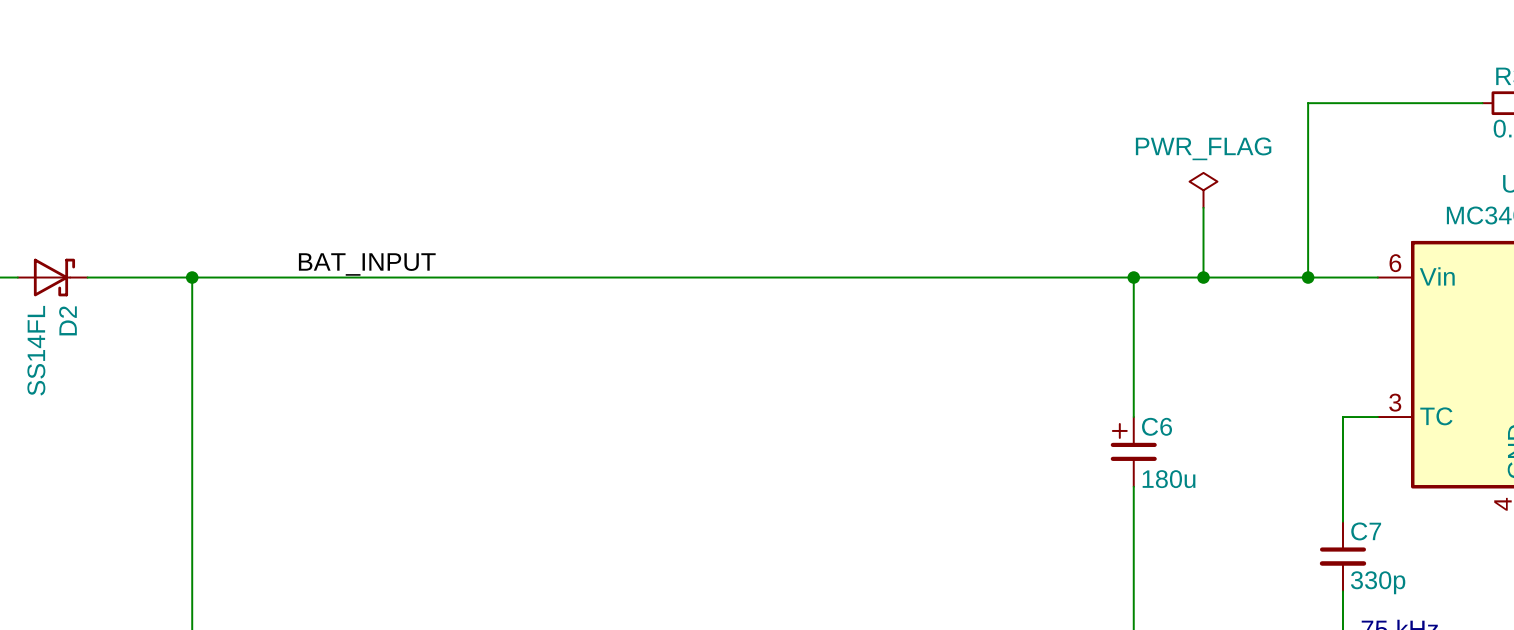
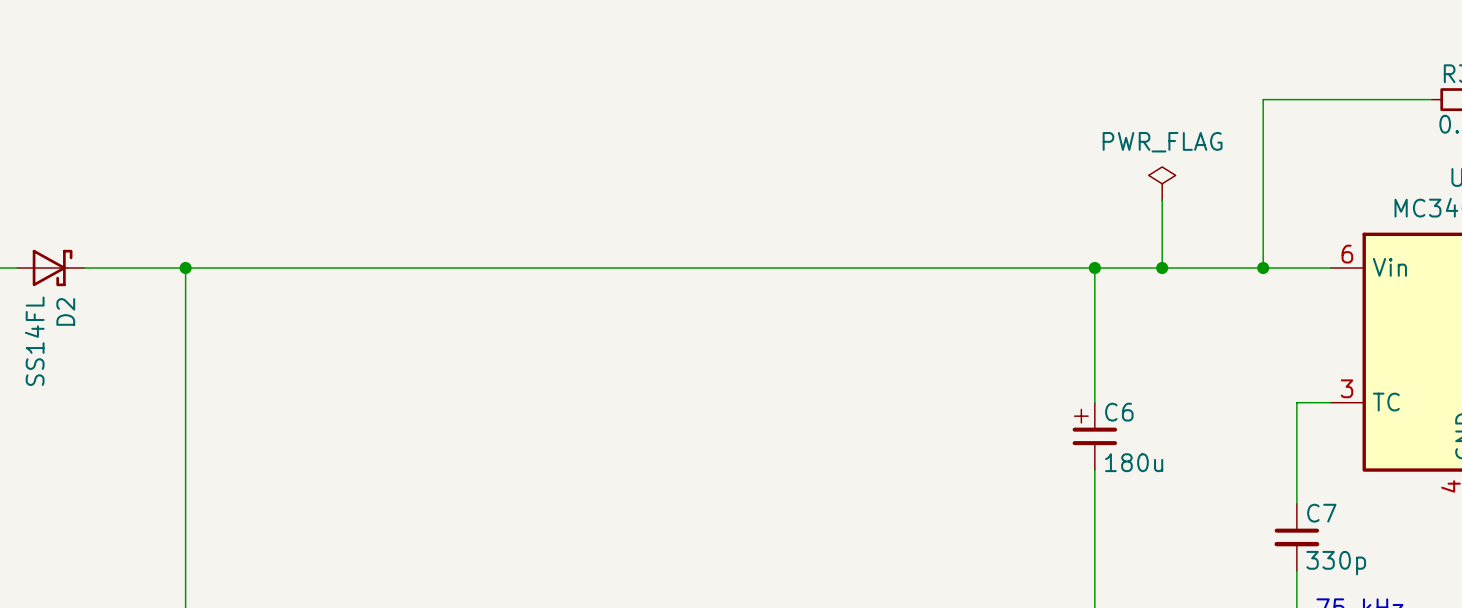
label: BAT_INPUT (367, 264) -> none

